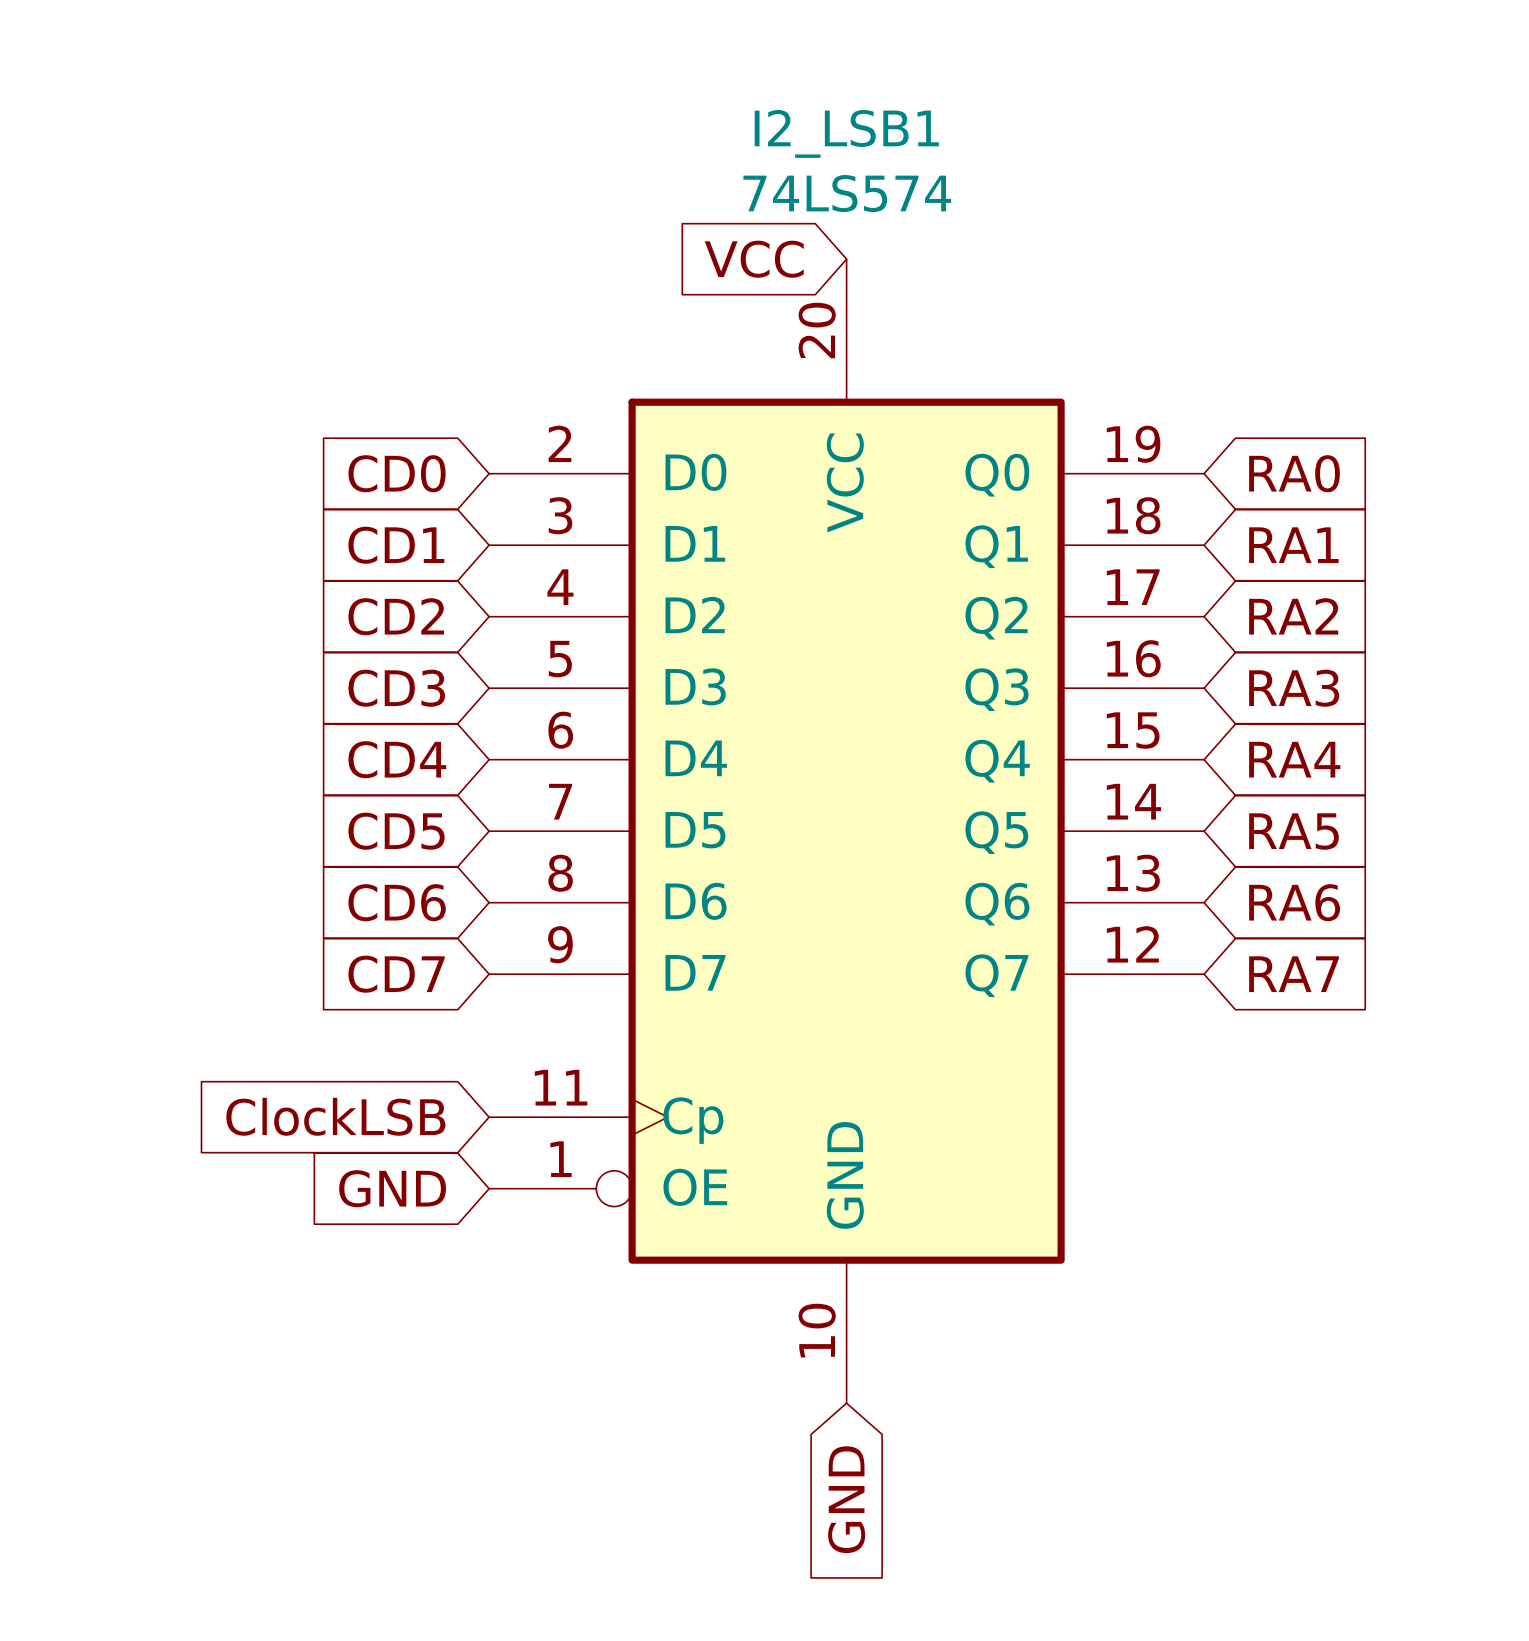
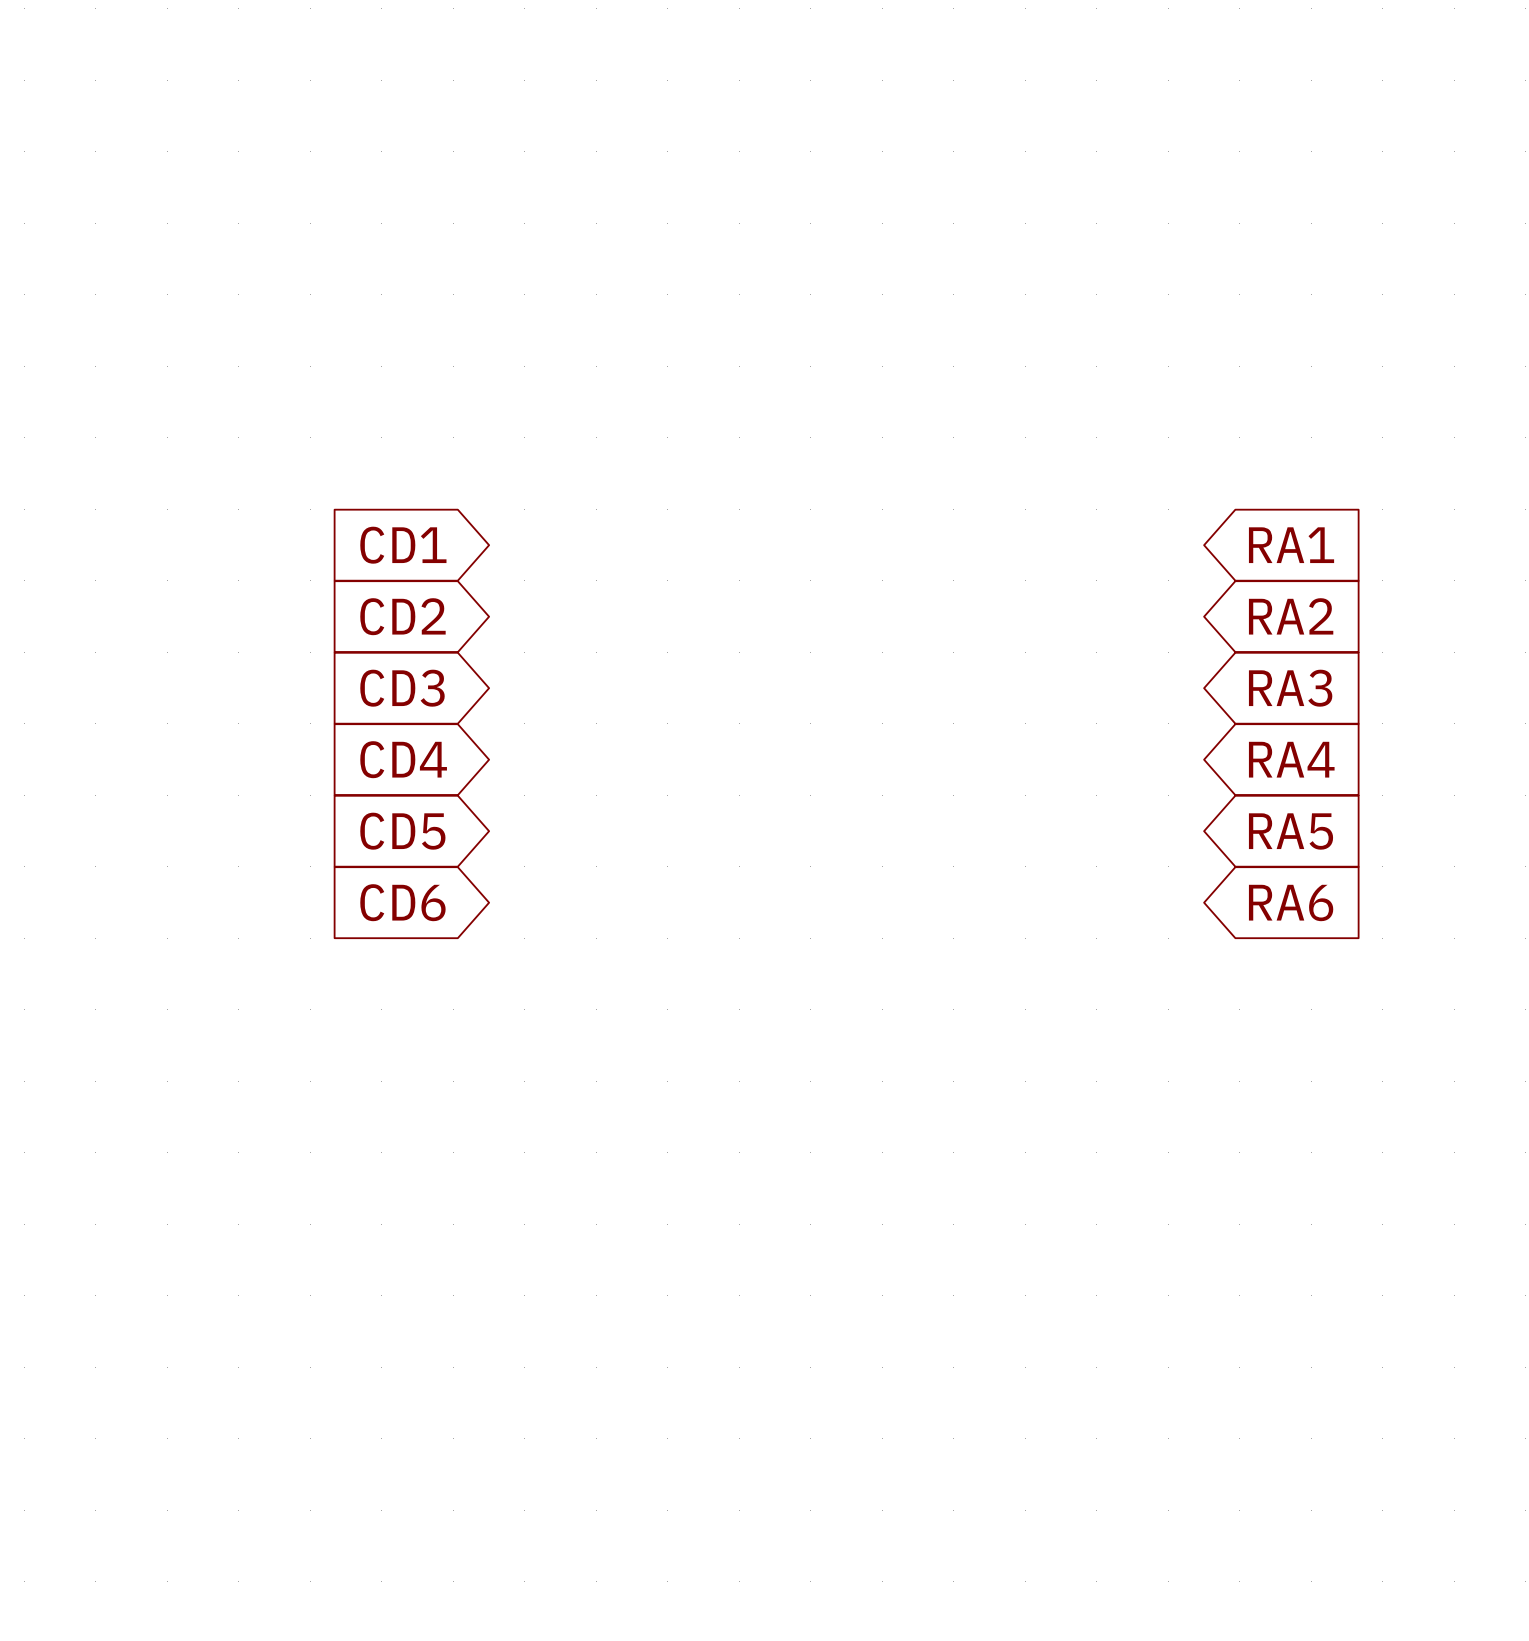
global label: VCC (754, 259) -> none
global label: CD0 (397, 473) -> none
global label: RA0 (1294, 473) -> none
I2_LSB1: 74LS574 (846, 831) -> none
global label: CD7 (396, 974) -> none
global label: RA7 (1294, 974) -> none
global label: ClockLSB (335, 1116) -> none
global label: GND (392, 1188) -> none
global label: GND (846, 1499) -> none

